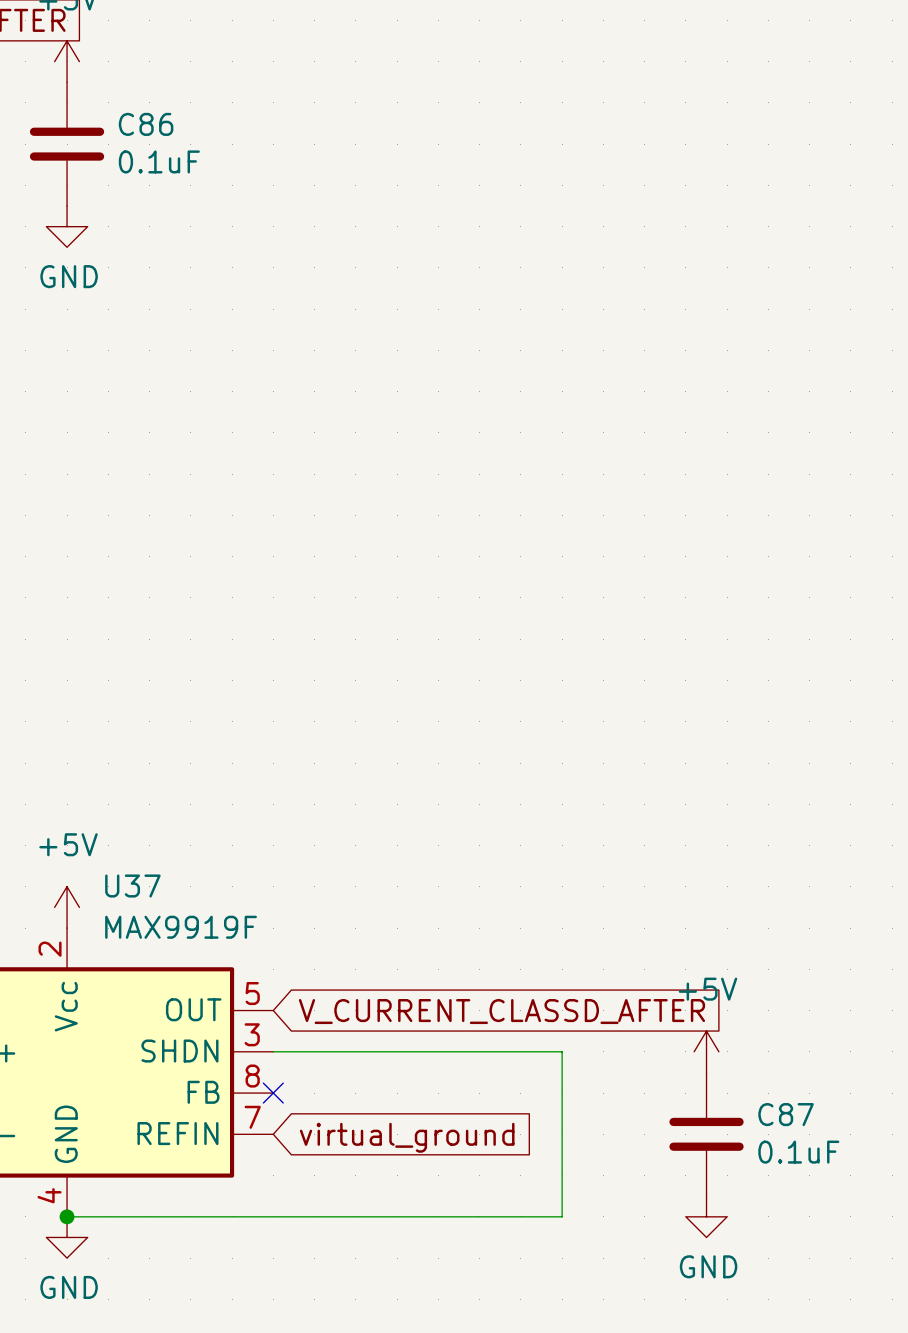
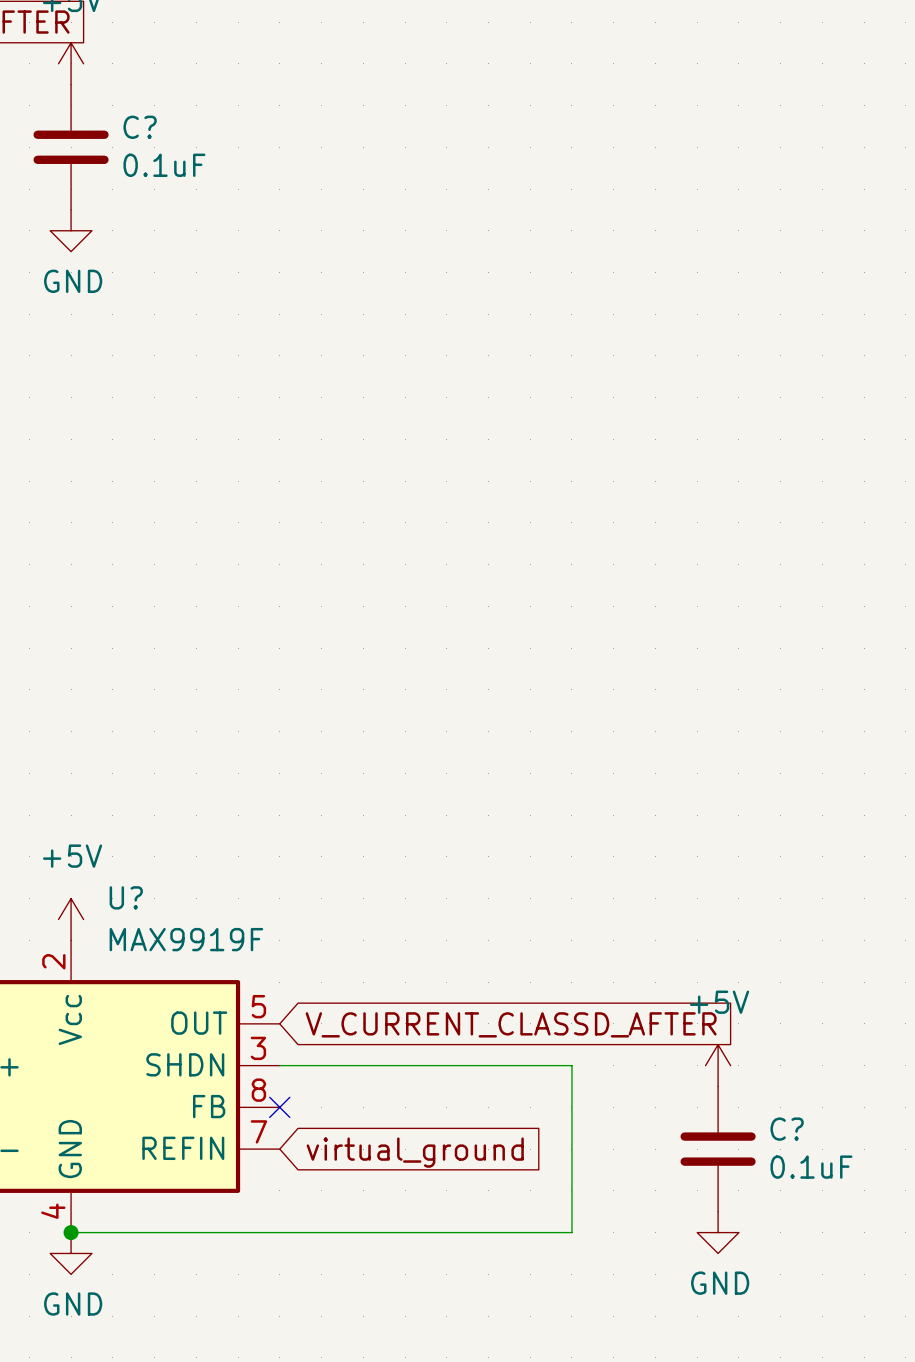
C86 name: C86 (146, 124) -> C? (140, 127)
U37 name: U37 (132, 886) -> U? (126, 897)
C87 name: C87 (786, 1114) -> C? (787, 1129)

